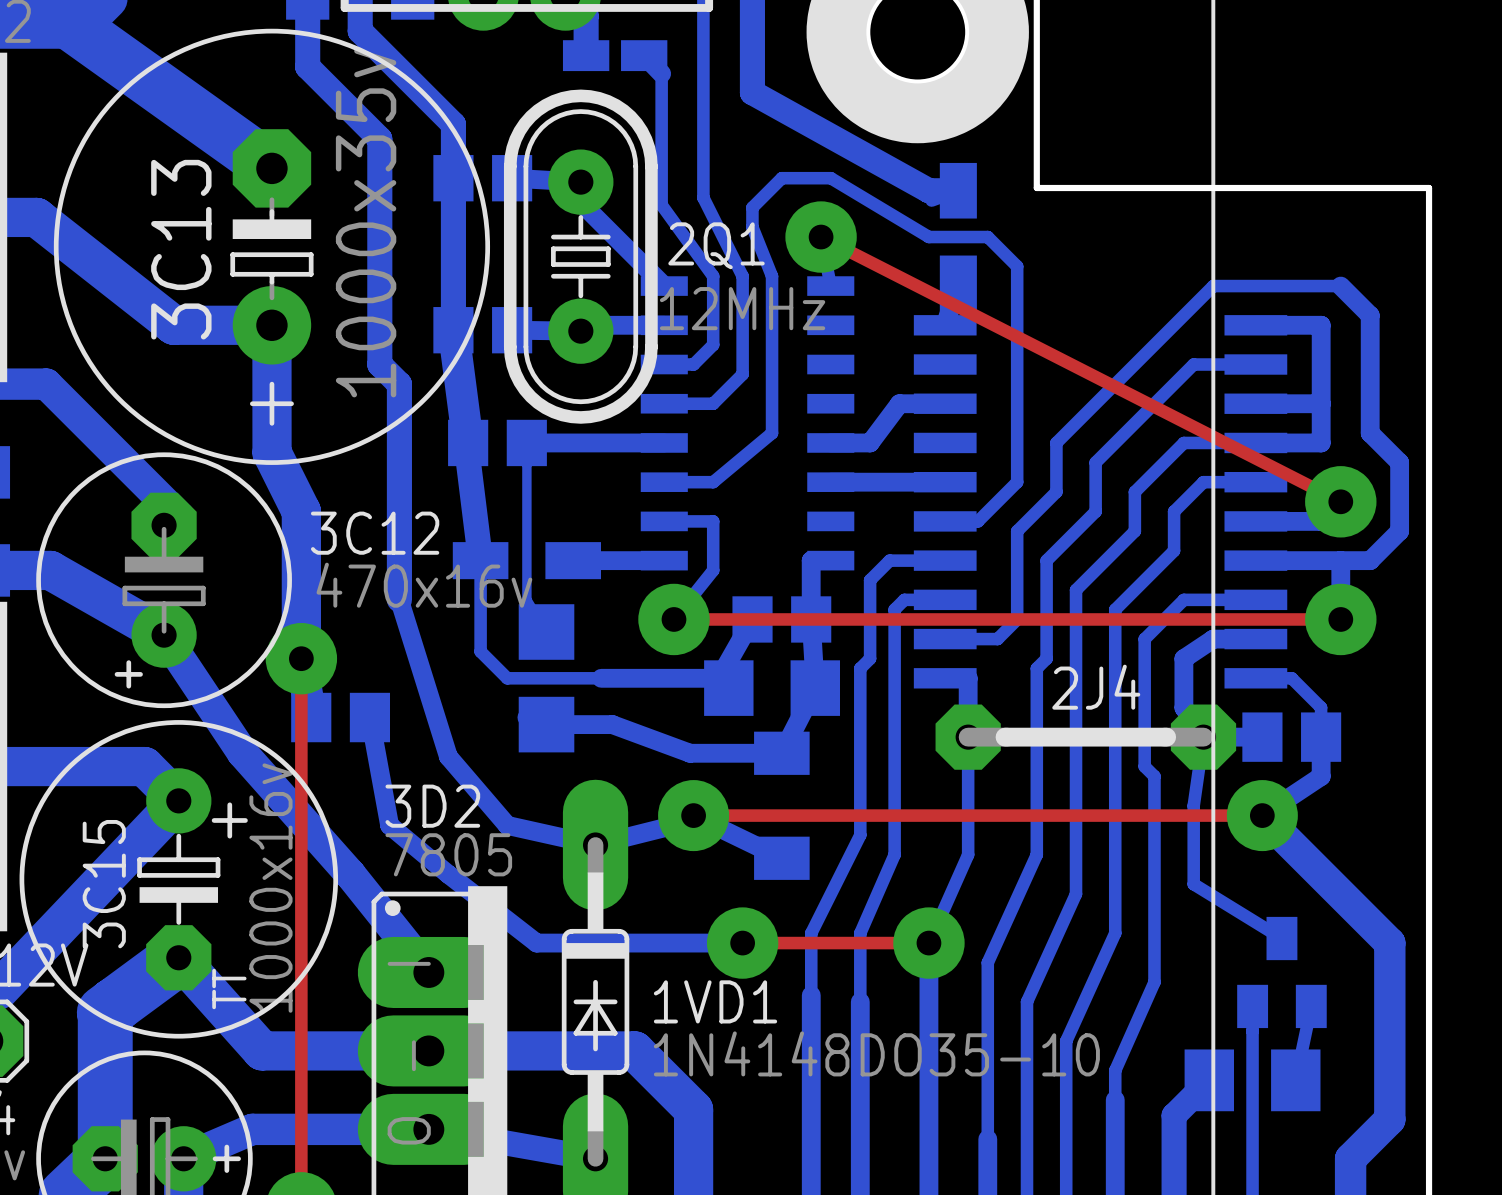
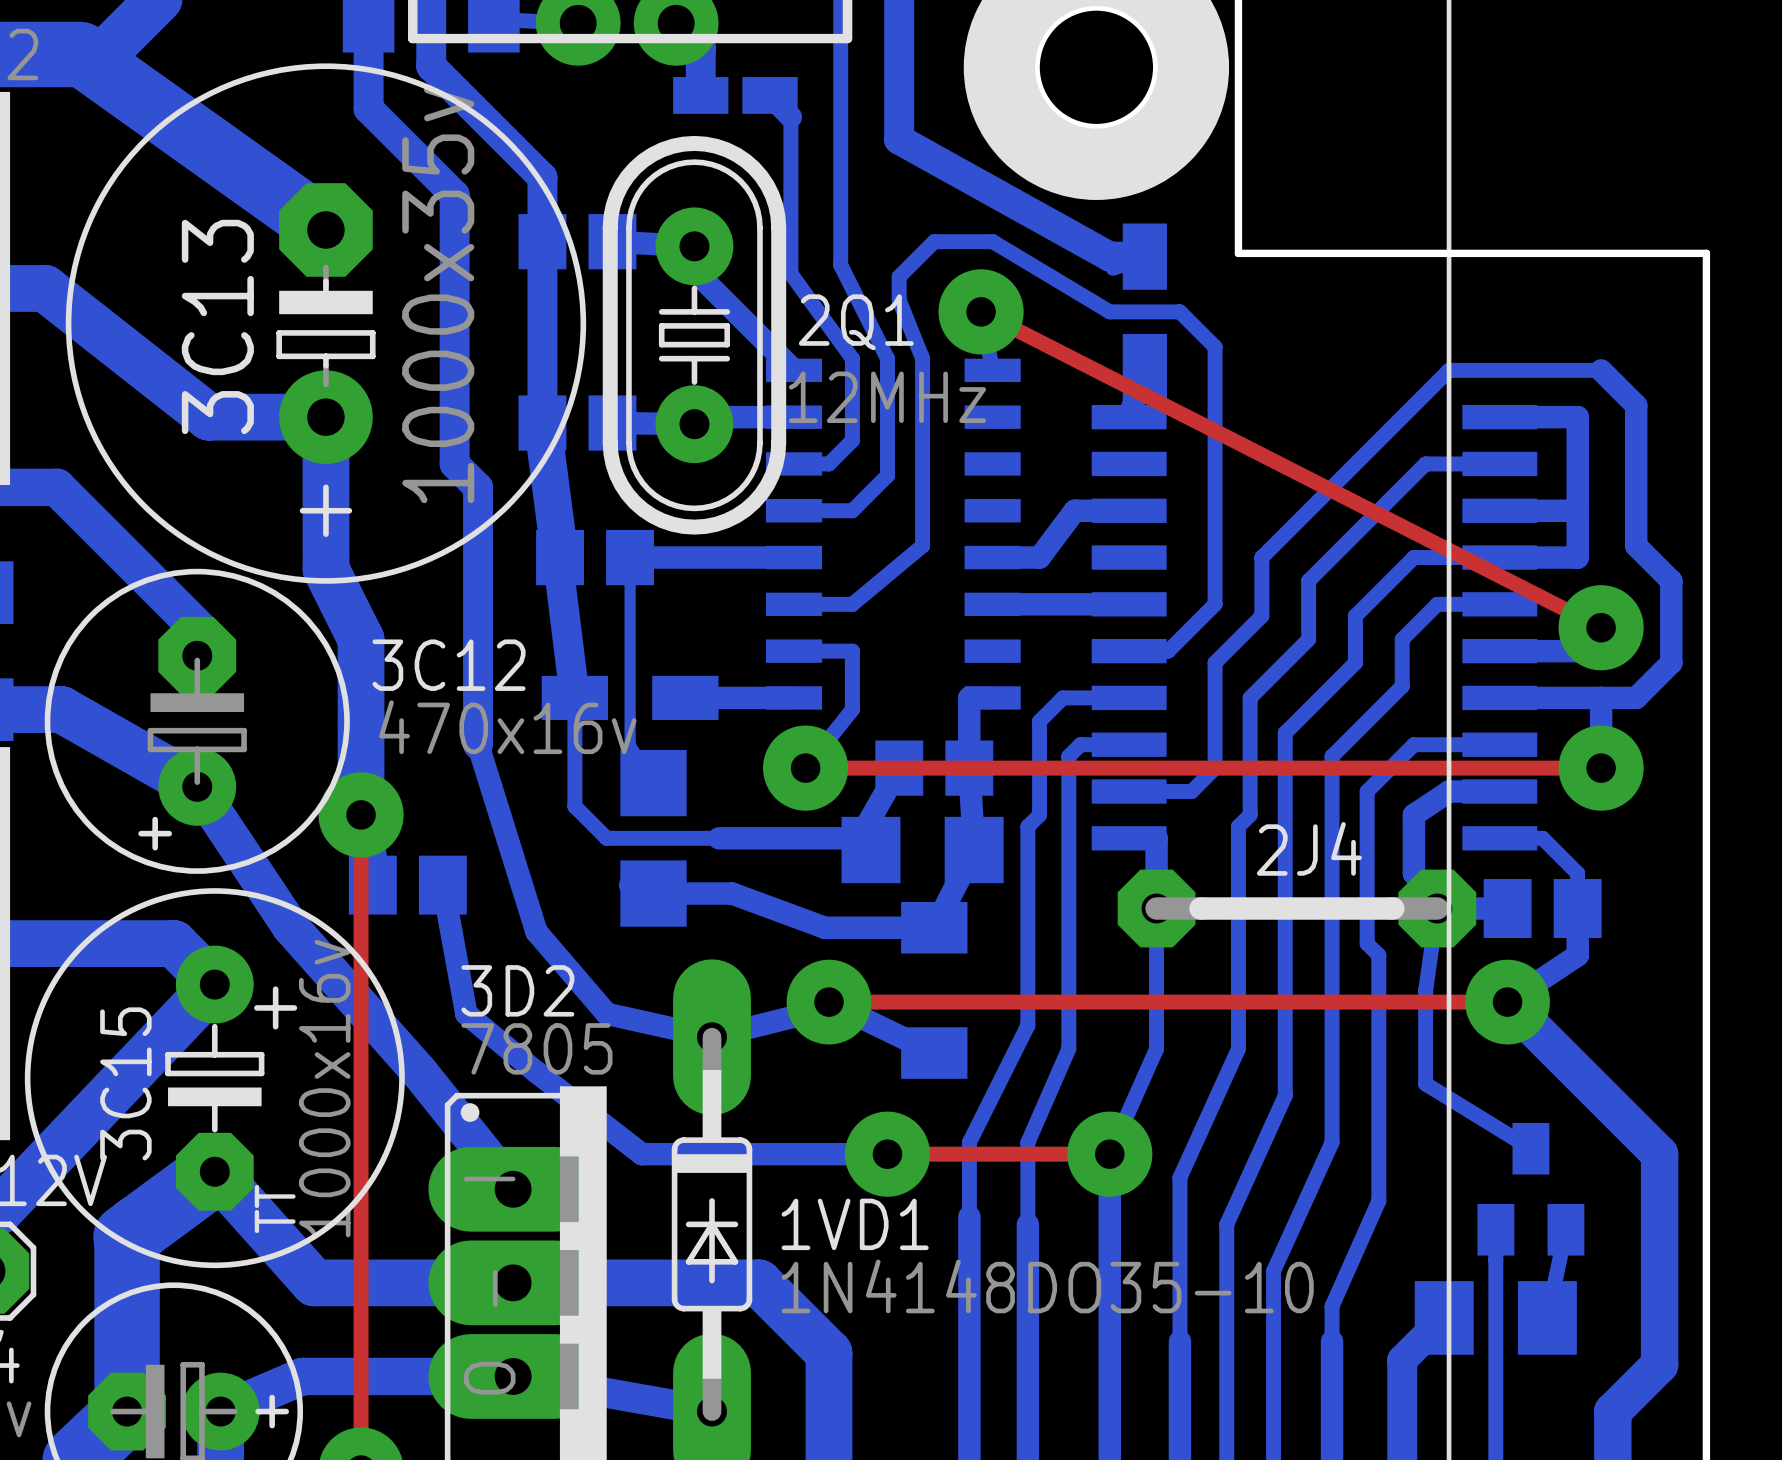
bottom track width: thin (987, 1099) (987, 1139) -> thick (1179, 1341) (1179, 1388)

